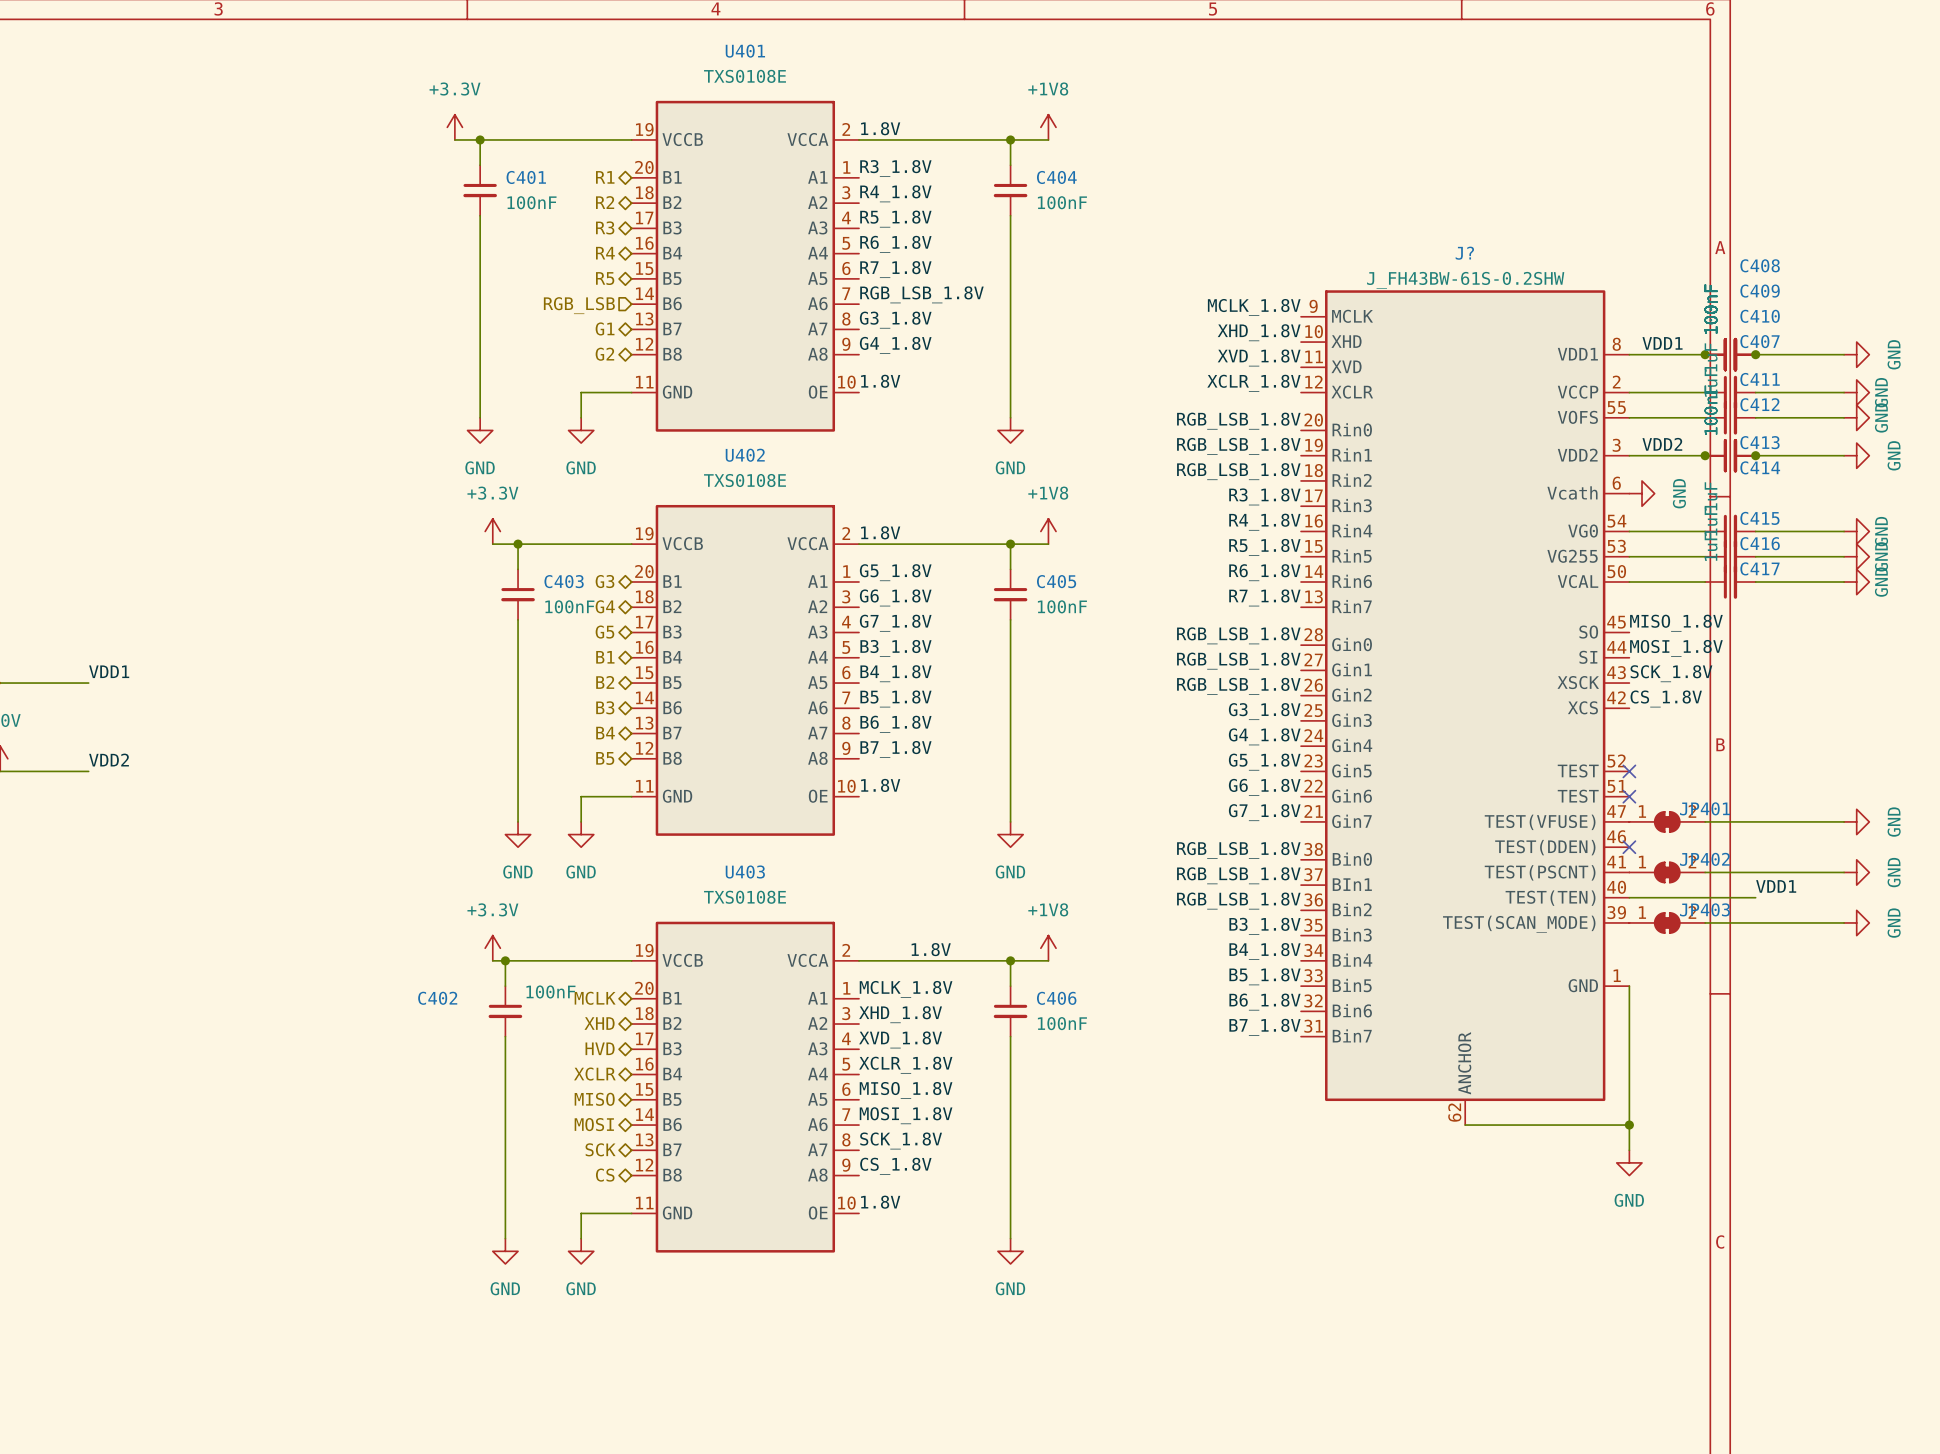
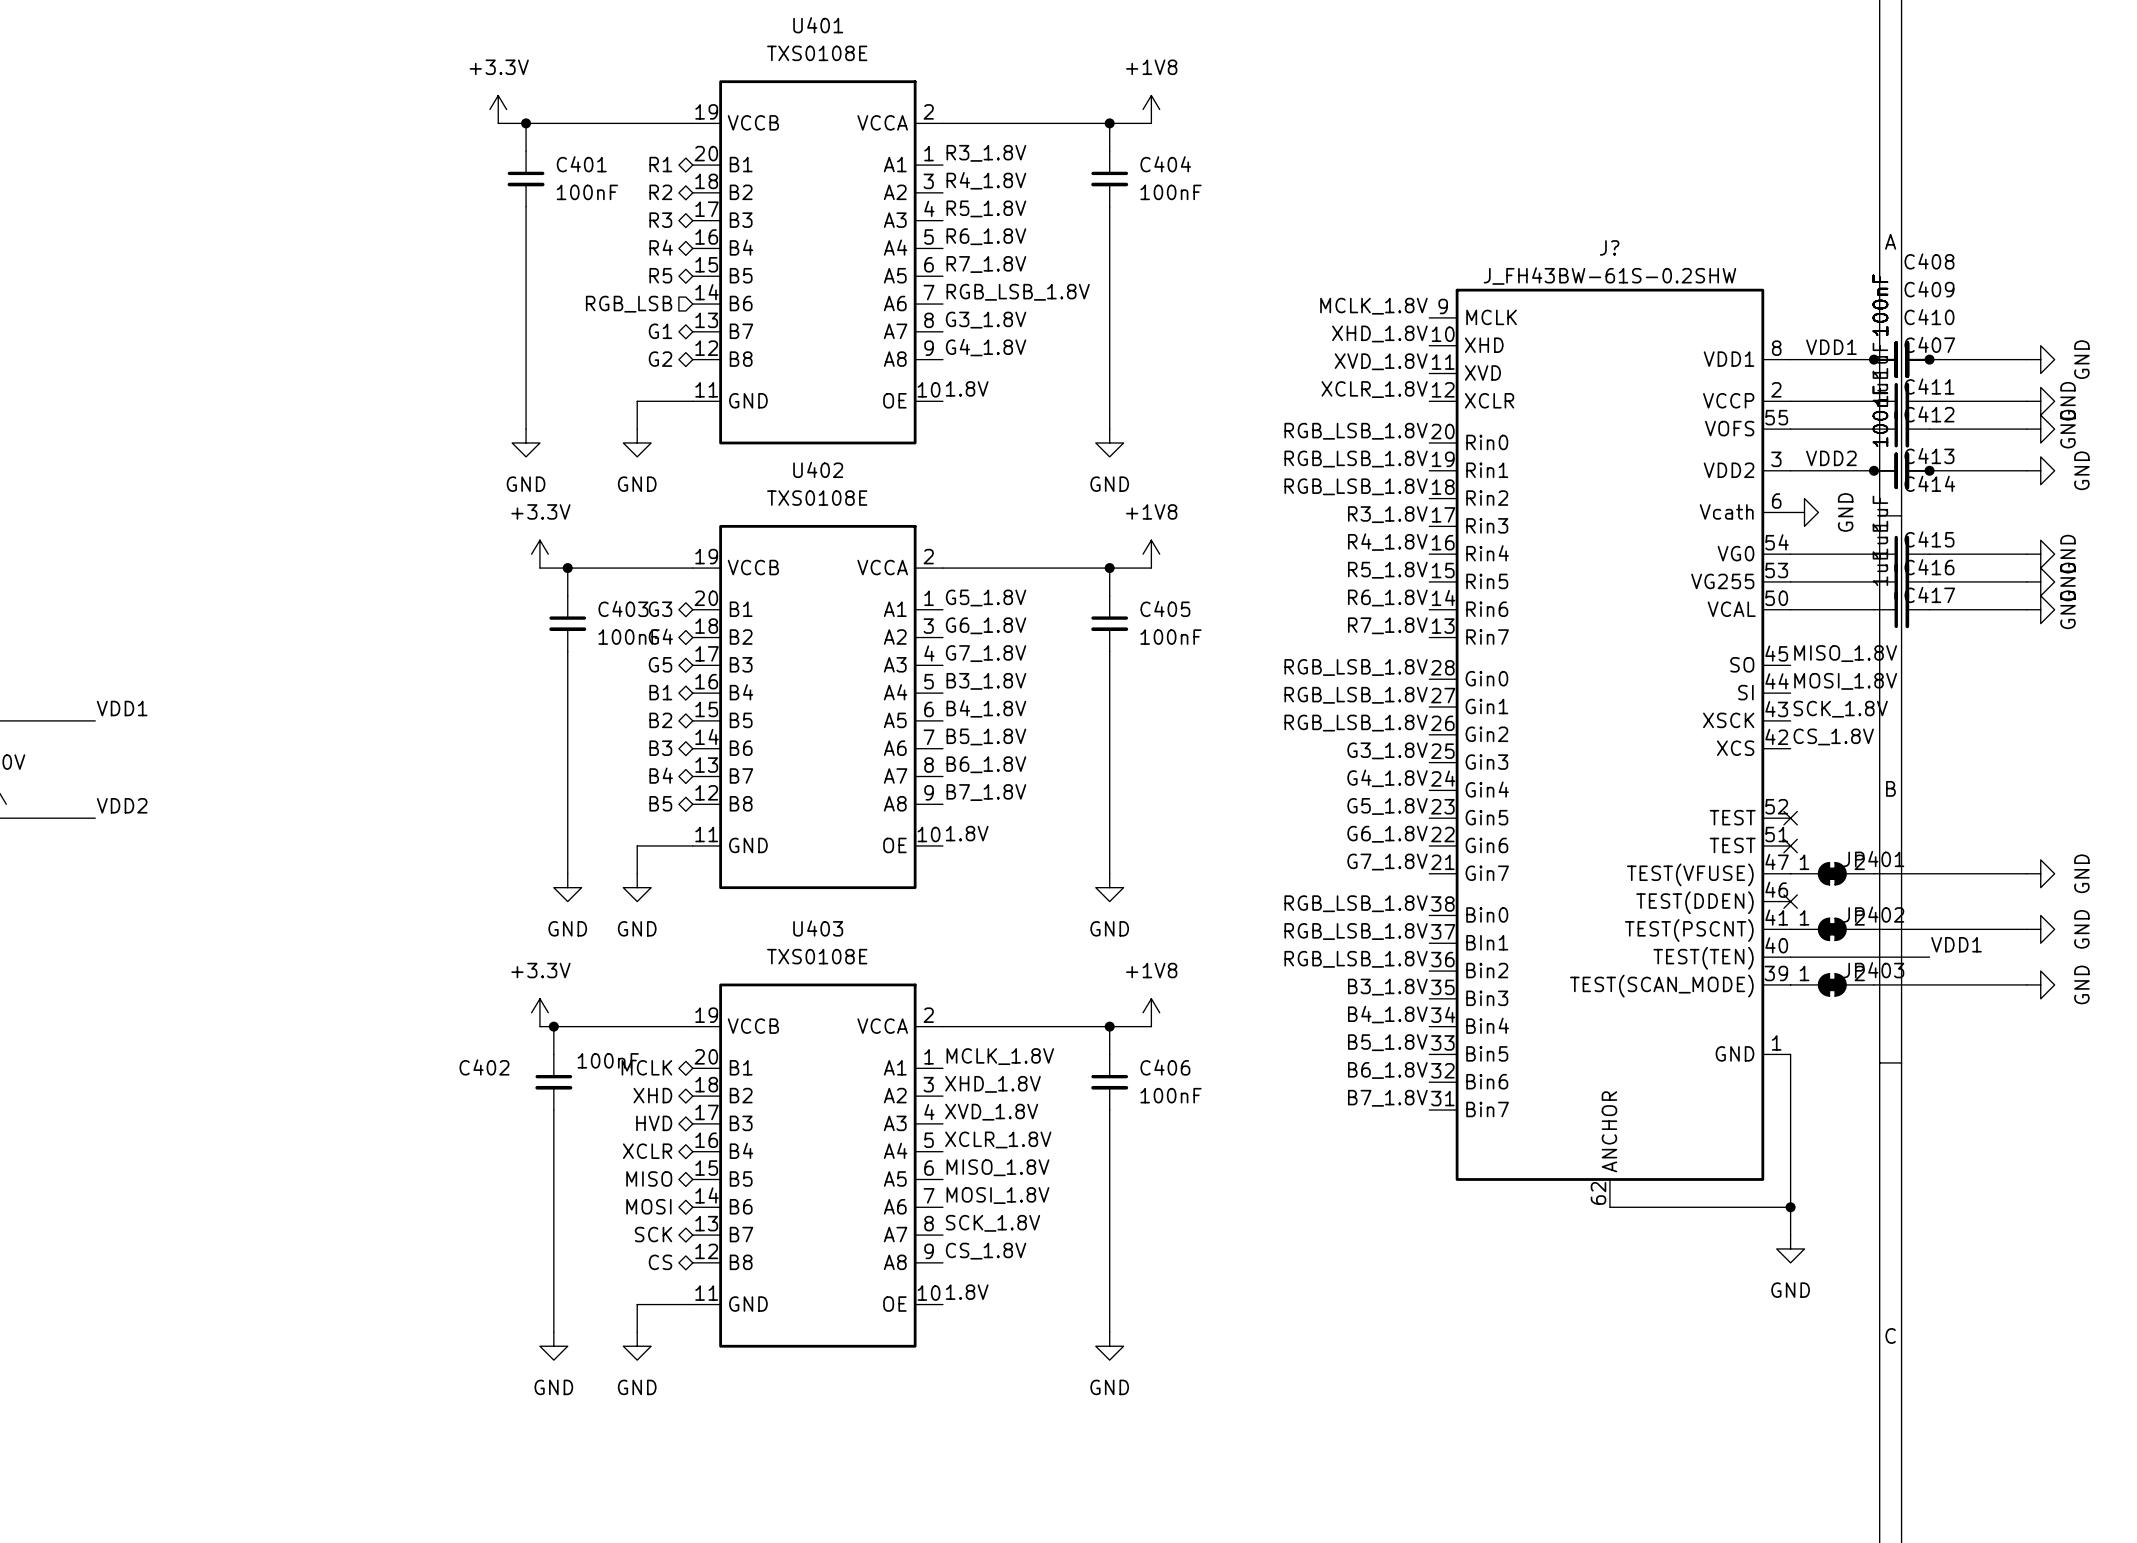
label: 1.8V (880, 128) -> none
label: 1.8V (880, 532) -> none
label: 1.8V (931, 949) -> none

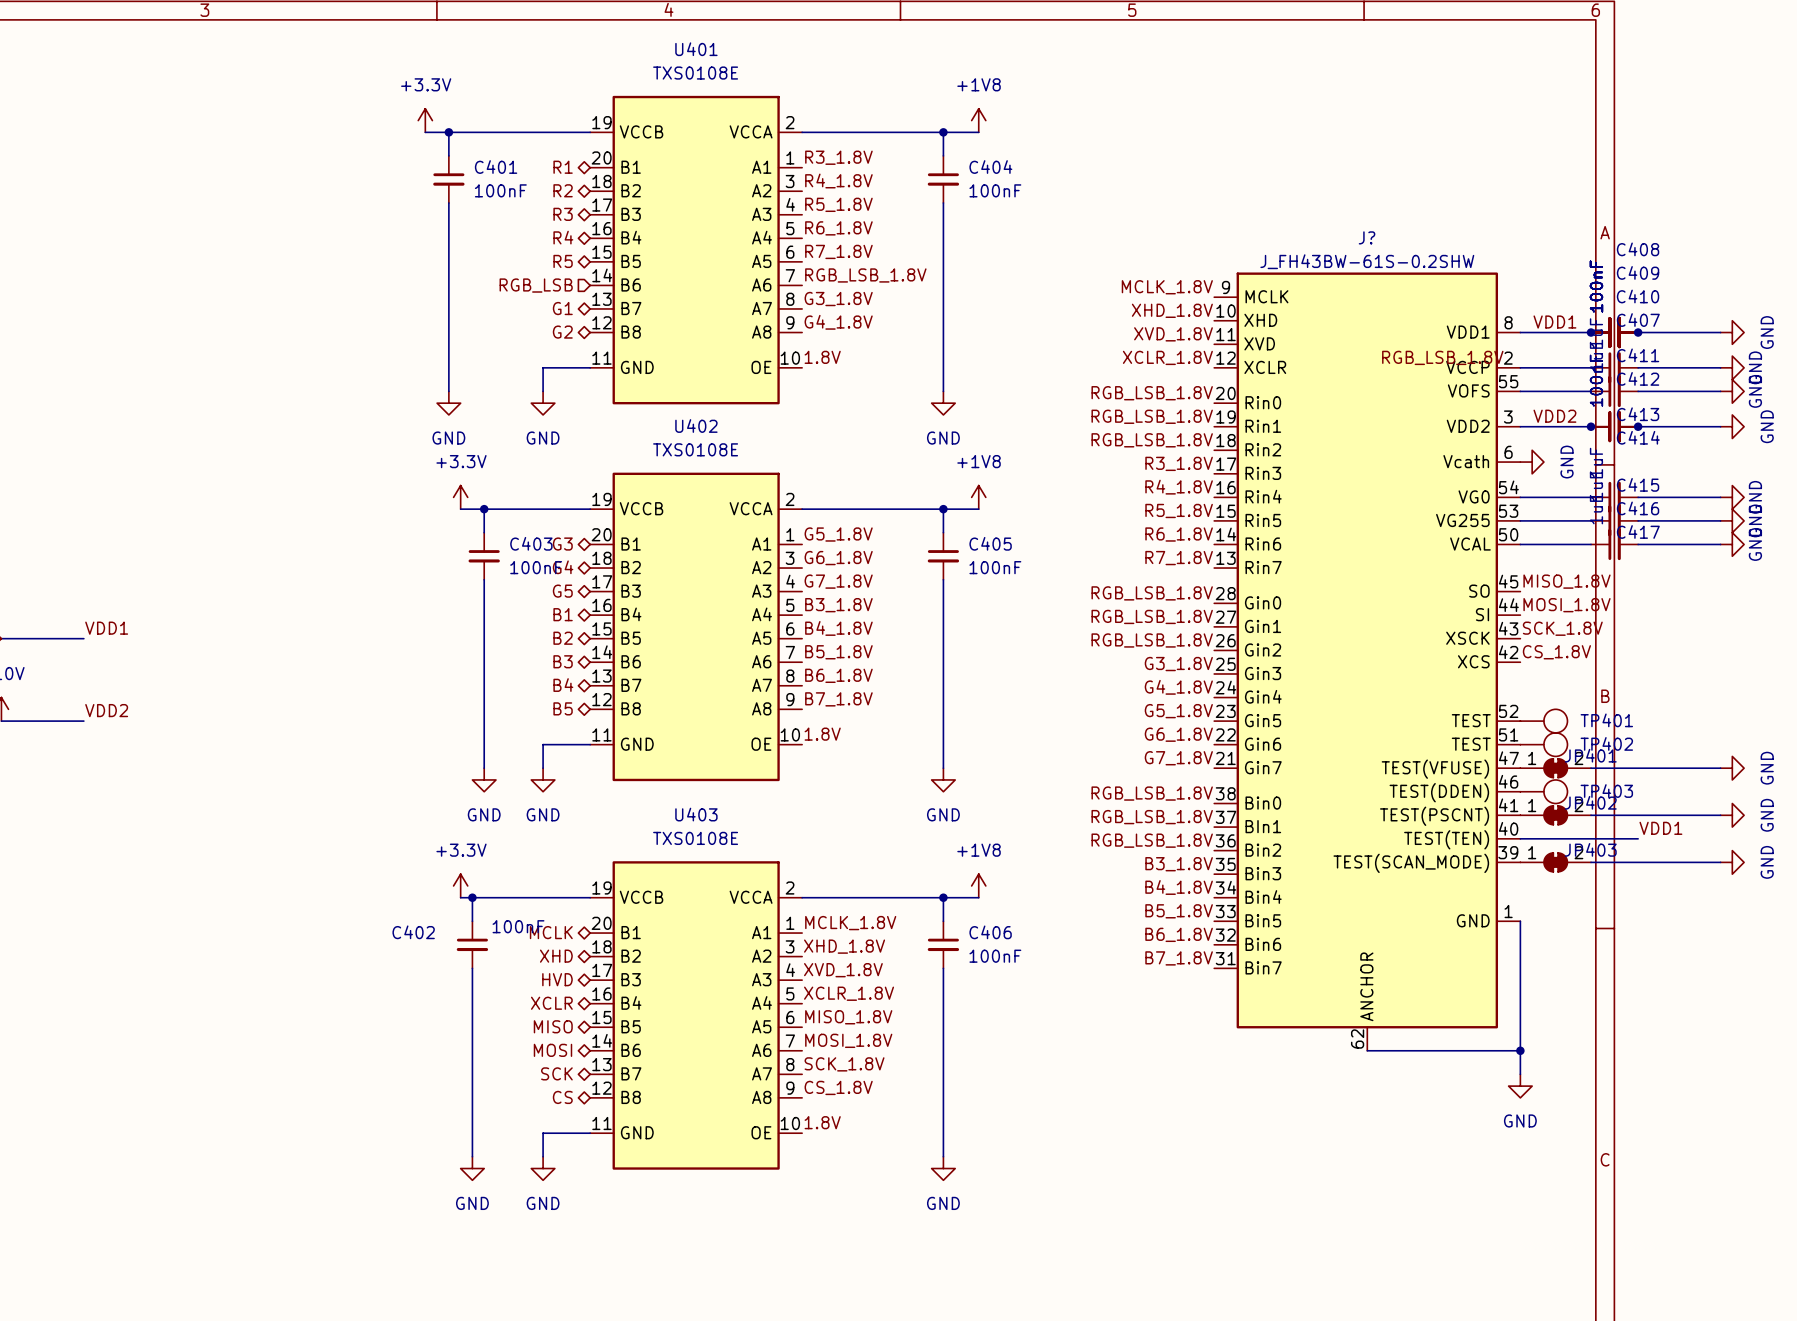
label: none -> RGB_LSB_1.8V (1442, 357)
no-connect mark: (1790, 818) -> none
TP401: none -> (1543, 721)
no-connect mark: (1790, 845) -> none
TP402: none -> (1543, 744)
no-connect mark: (1790, 901) -> none
TP403: none -> (1543, 791)

